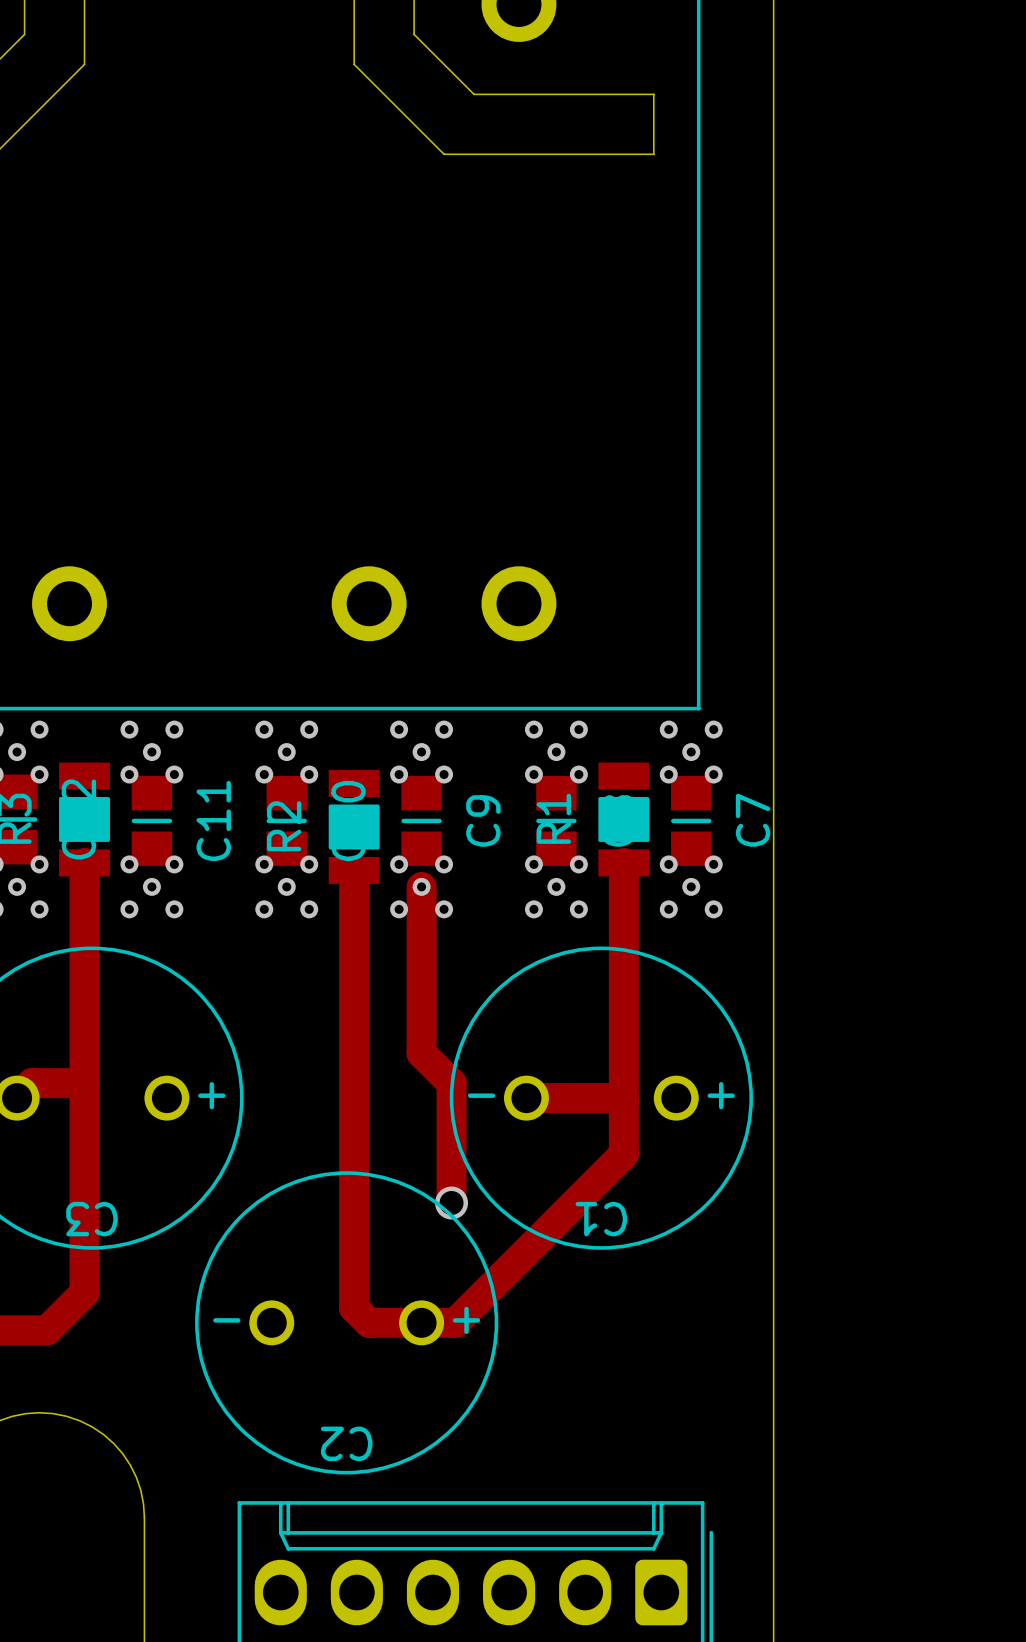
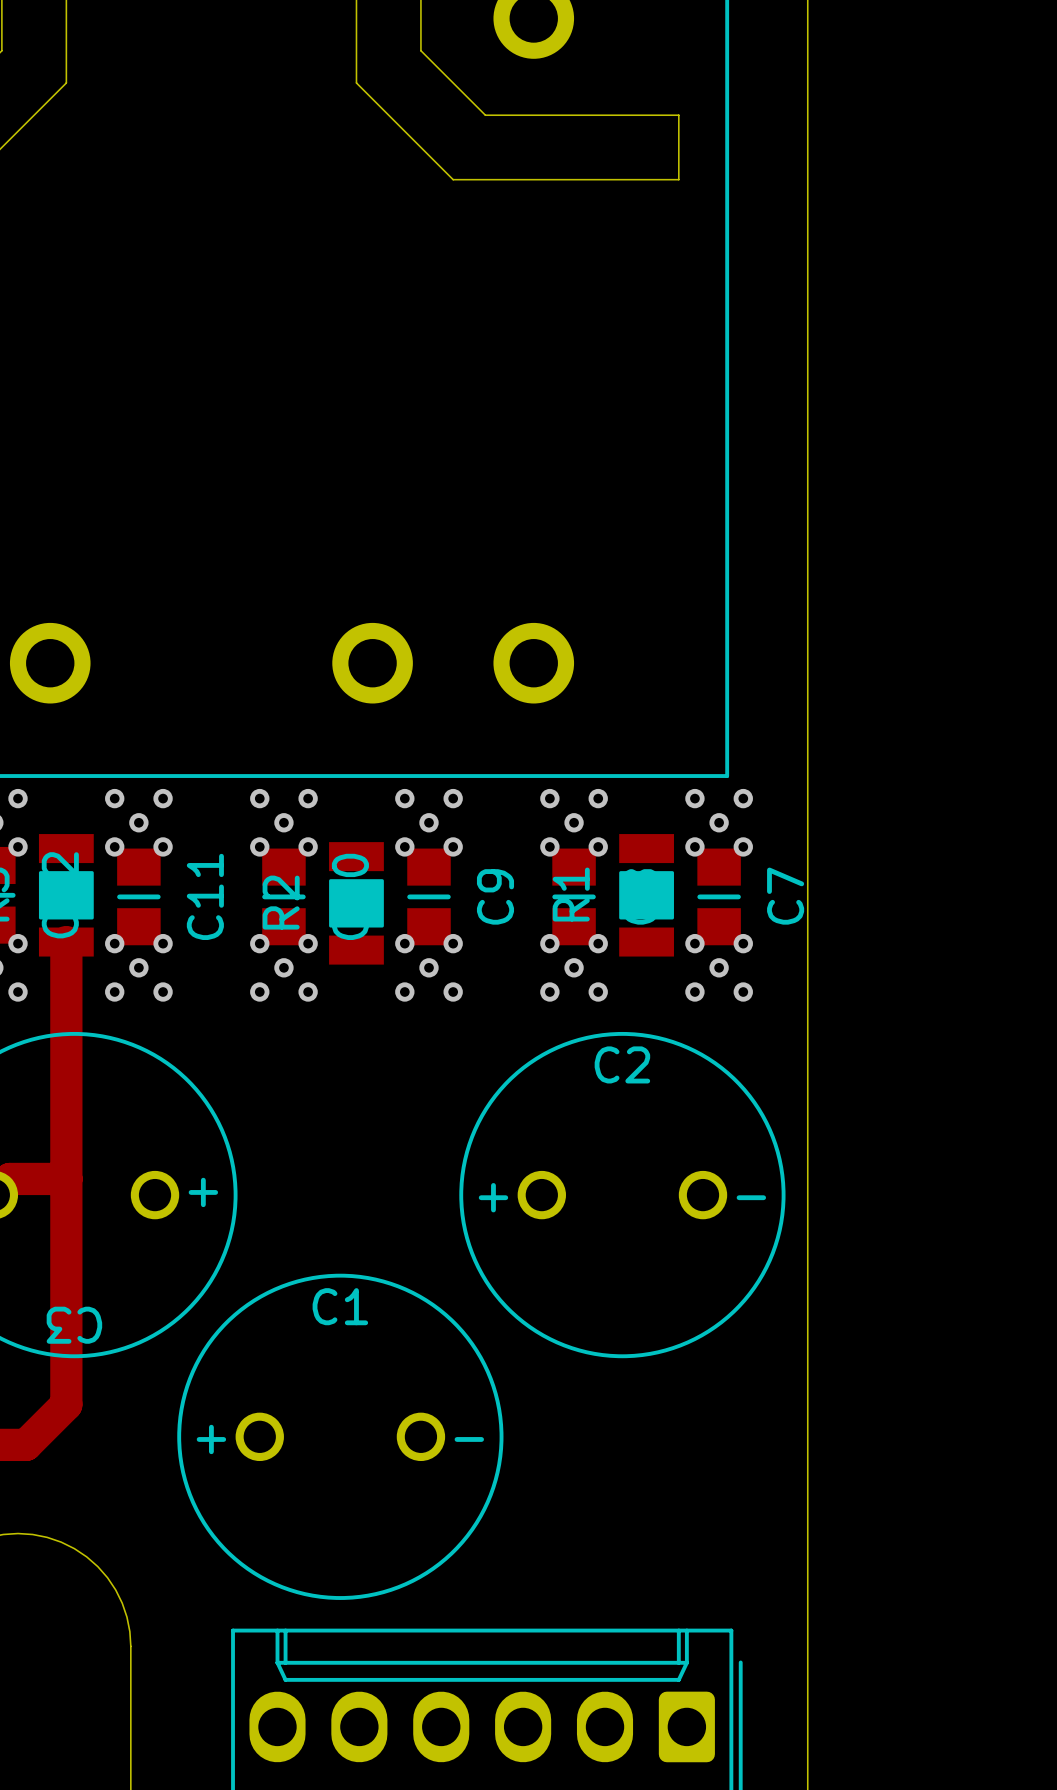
track: (623, 862) (623, 1154) (455, 1322) (369, 1322) (354, 1307) (354, 870) -> none
track: (421, 886) (421, 1053) (451, 1083) (451, 1203) -> none
track: (526, 1098) (623, 1098) -> none
C1 rotation: 0° (601, 1098) -> 180° (340, 1436)
C1 position: (601, 1098) -> (340, 1436)
via: (451, 1203) -> none
C2 rotation: 0° (346, 1322) -> 180° (622, 1195)
C2 position: (346, 1322) -> (622, 1195)

